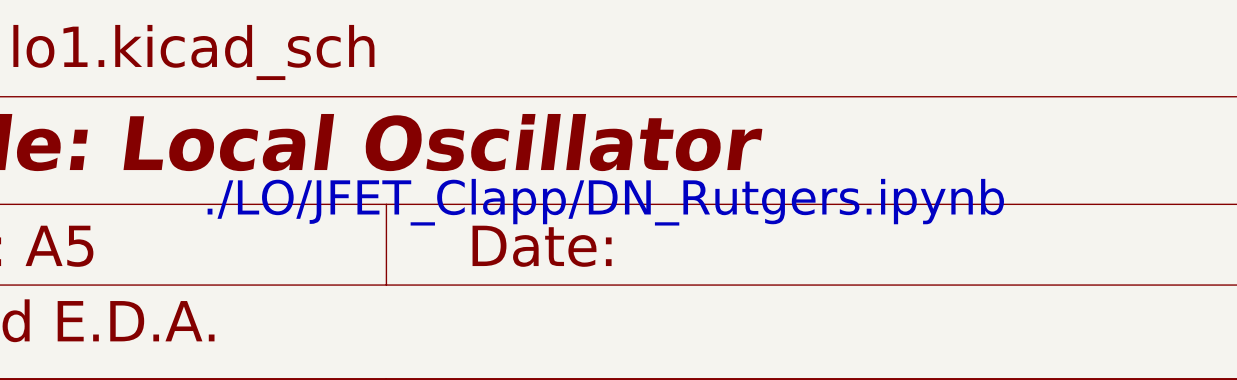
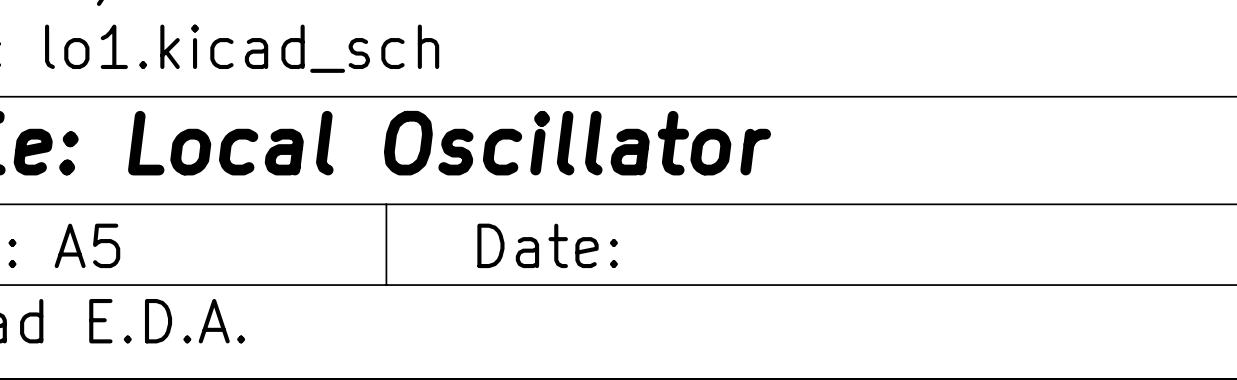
text: ./LO/JFET_Clapp/DN_Rutgers.ipynb (605, 202) -> none

